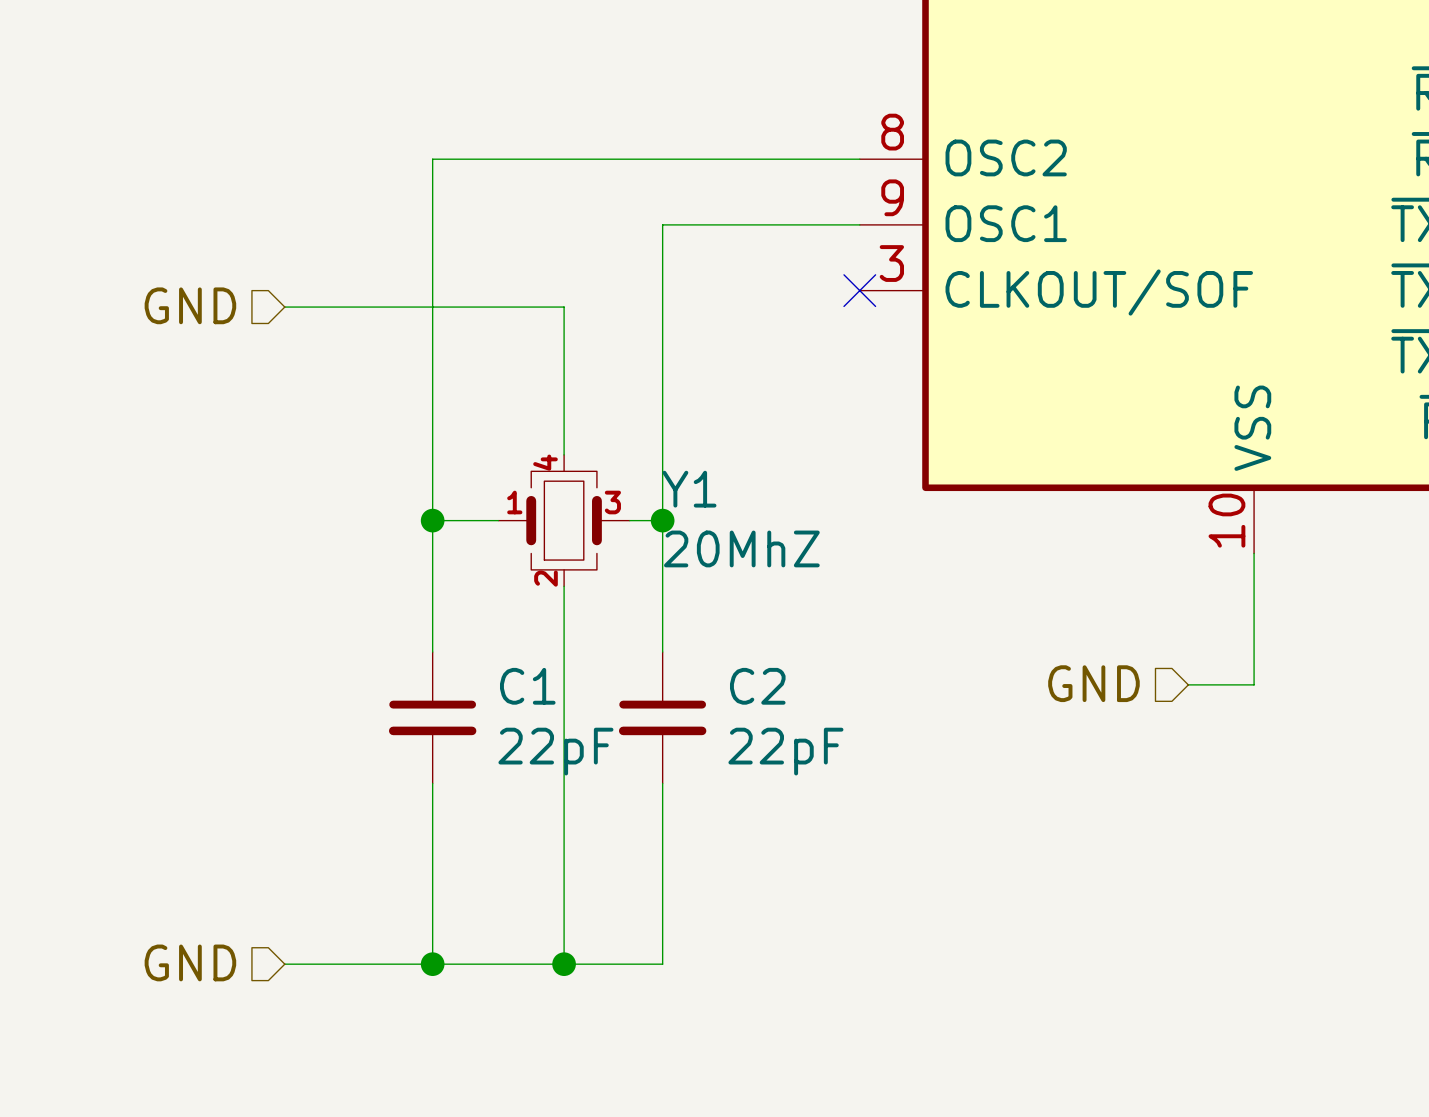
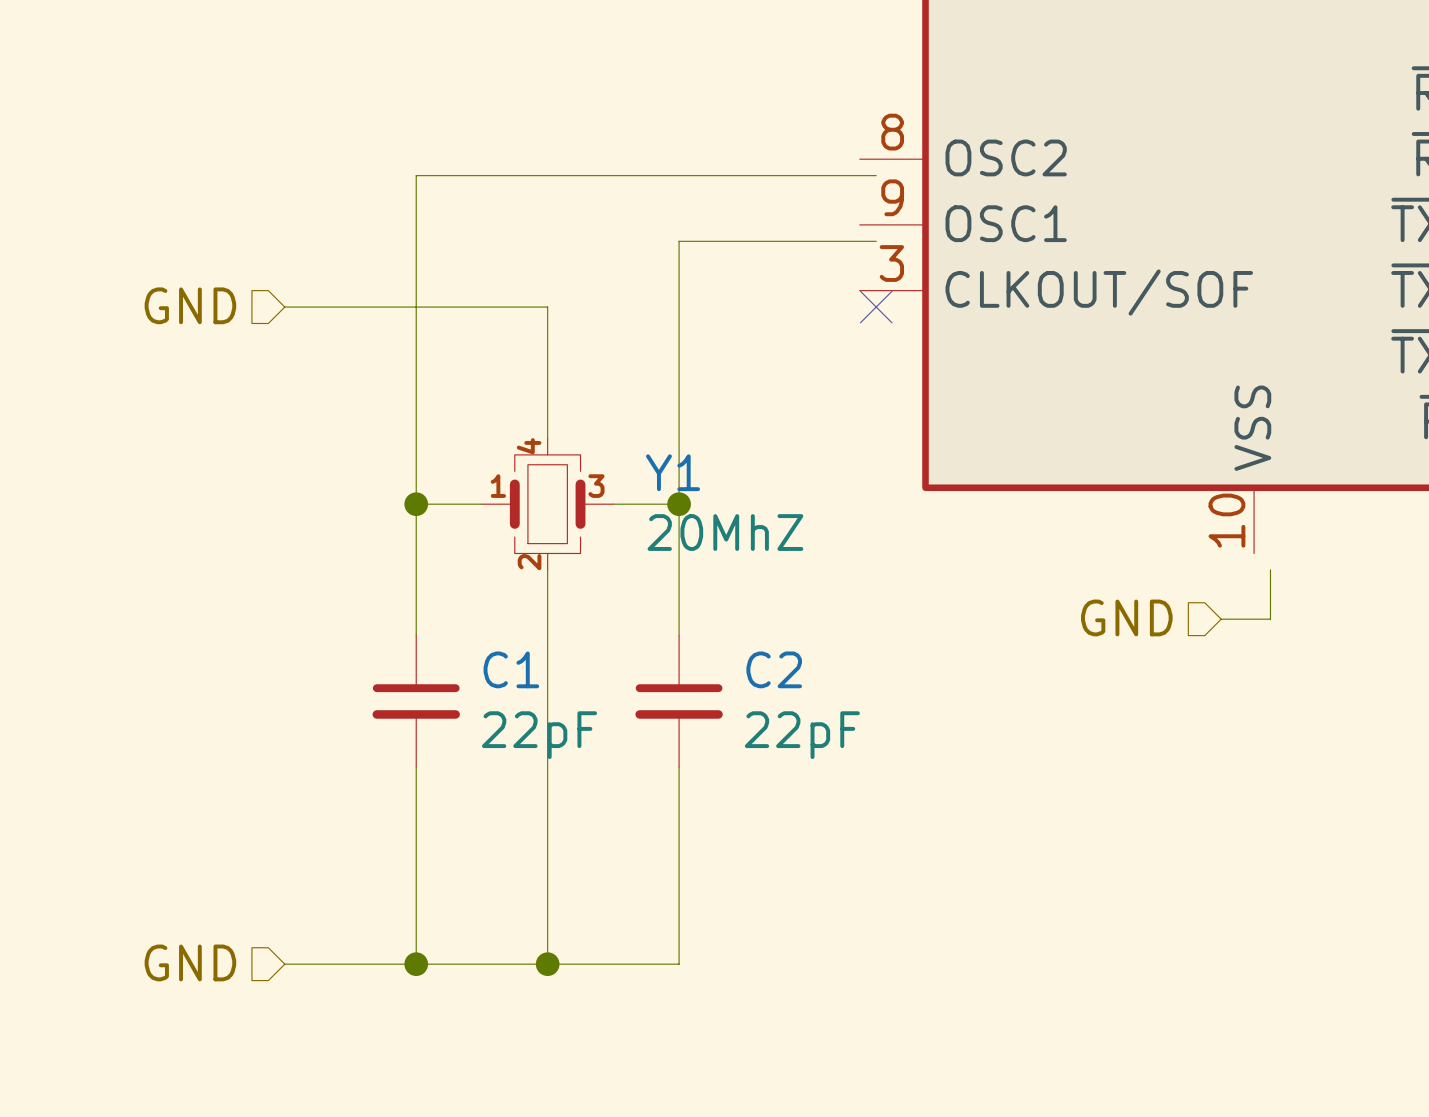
wire: (859, 159) (432, 159) (432, 652) -> none
wire: none -> (876, 175) (416, 175) (416, 635)
wire: (859, 224) (662, 224) (662, 652) -> none
wire: none -> (876, 241) (679, 241) (679, 635)
no-connect mark position: (859, 290) -> (876, 307)
wire: (547, 307) (564, 307) (564, 454) -> (547, 307) (547, 438)
wire: none -> (613, 504) (679, 504)
wire: (432, 520) (498, 520) -> (416, 504) (481, 504)
junction position: (432, 520) -> (416, 504)
Y1 position: (564, 520) -> (547, 504)
wire: (629, 520) (662, 520) -> none
junction position: (662, 520) -> (679, 504)
wire: (1254, 553) (1254, 684) (1188, 684) -> none
wire: none -> (547, 569) (547, 964)
wire: none -> (1270, 569) (1270, 619) (1221, 619)
wire: (564, 586) (564, 964) -> none
hierarchical label position: GND (1093, 683) -> GND (1126, 617)
C1 position: (432, 717) -> (416, 701)
C2 position: (662, 717) -> (679, 701)
wire: none -> (416, 767) (416, 964)
wire: (432, 783) (432, 964) -> none
wire: (662, 783) (662, 964) -> (679, 767) (679, 964) (662, 964)
junction position: (432, 964) -> (416, 964)
junction position: (564, 964) -> (547, 964)

